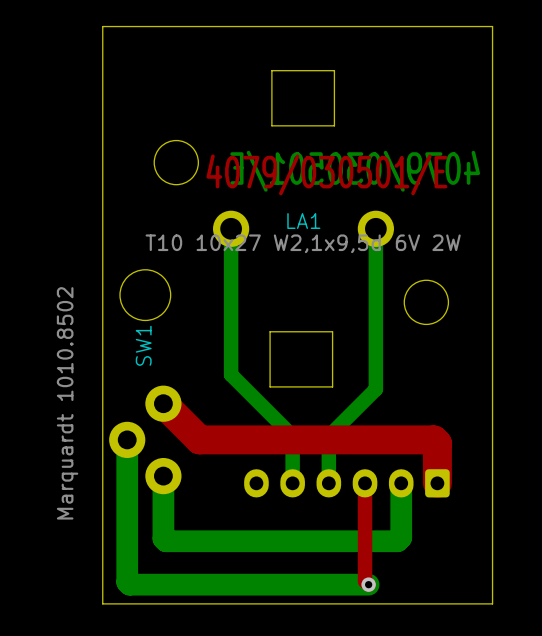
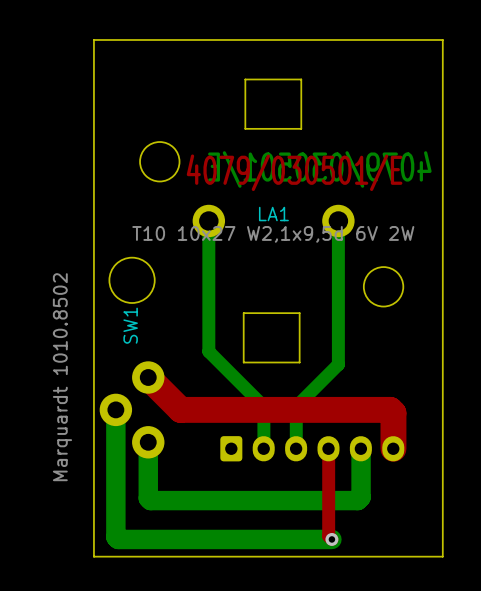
part rotation: 0° (346, 483) -> 180° (312, 448)

